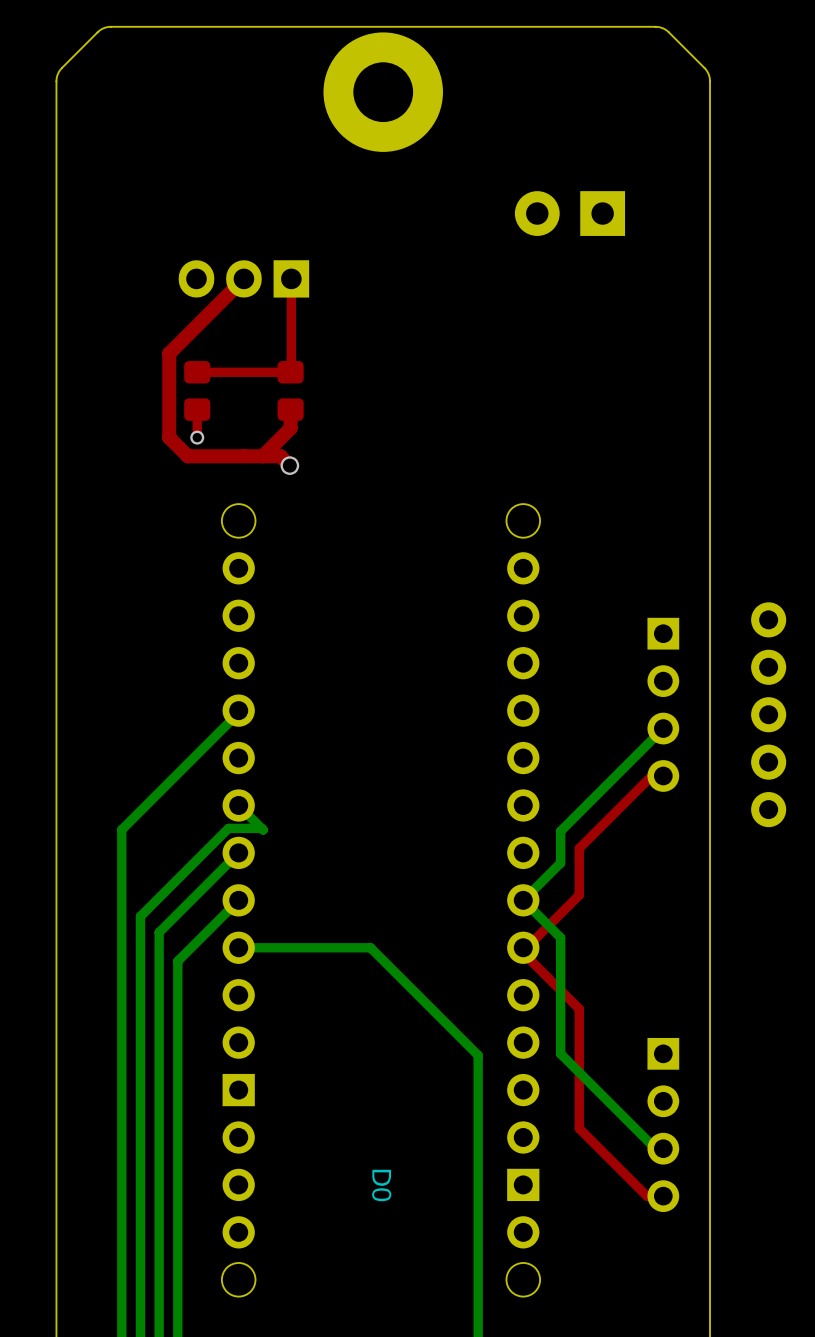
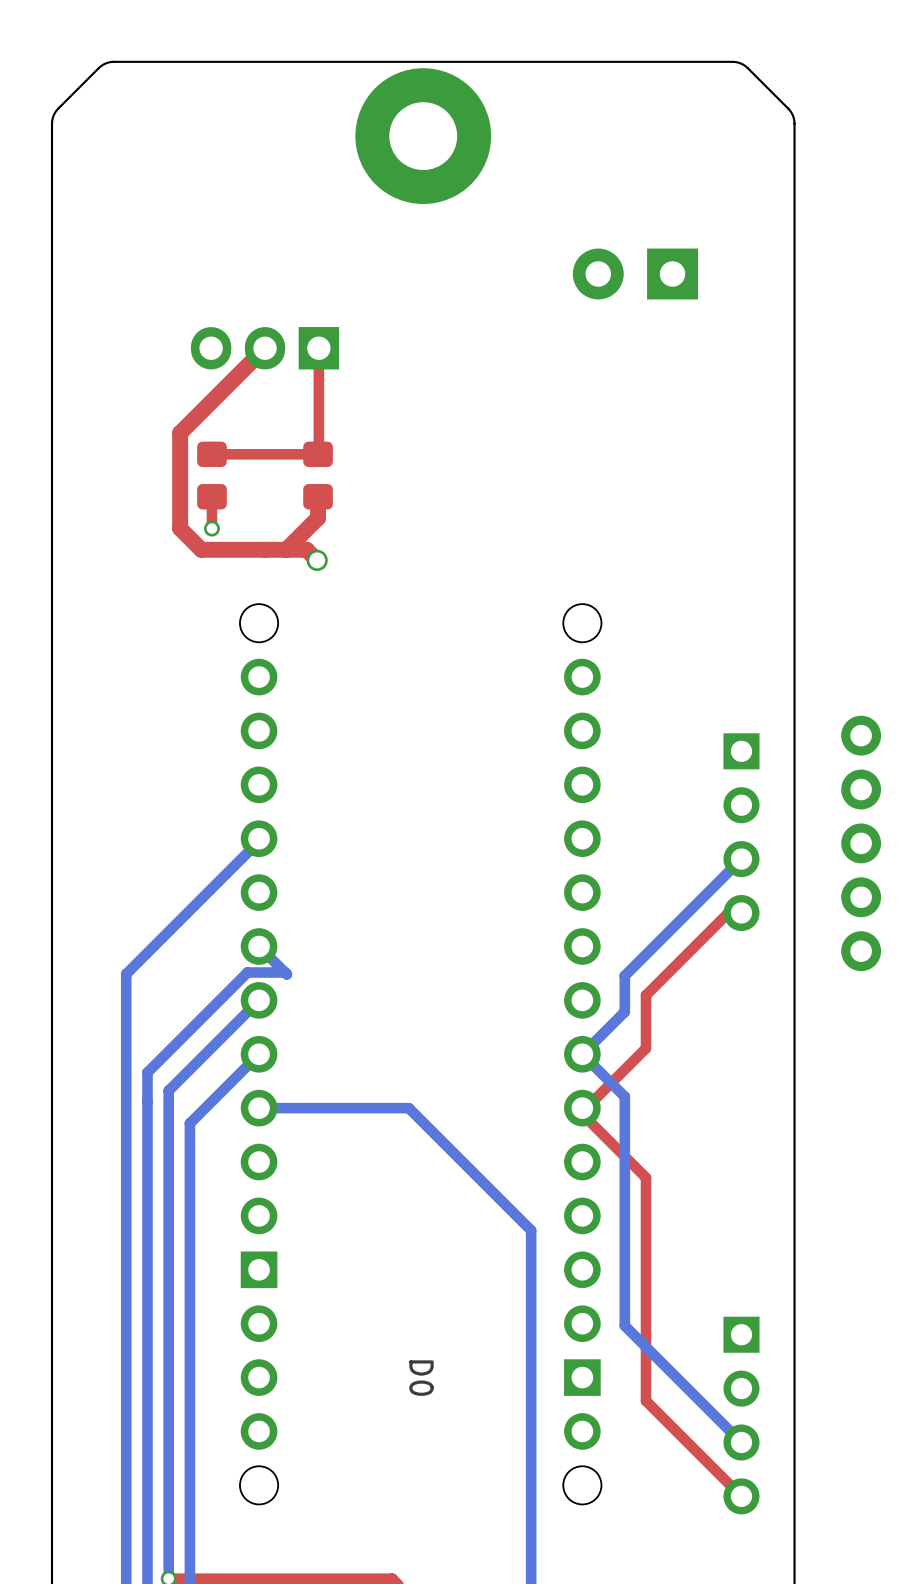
bottom track: (560, 1053) (655, 1148) -> (624, 1228) (624, 1325) (741, 1442)
part position: (663, 1124) -> (741, 1415)
top track: (579, 1128) (646, 1196) (663, 1196) -> (646, 1313) (646, 1400) (741, 1496)

